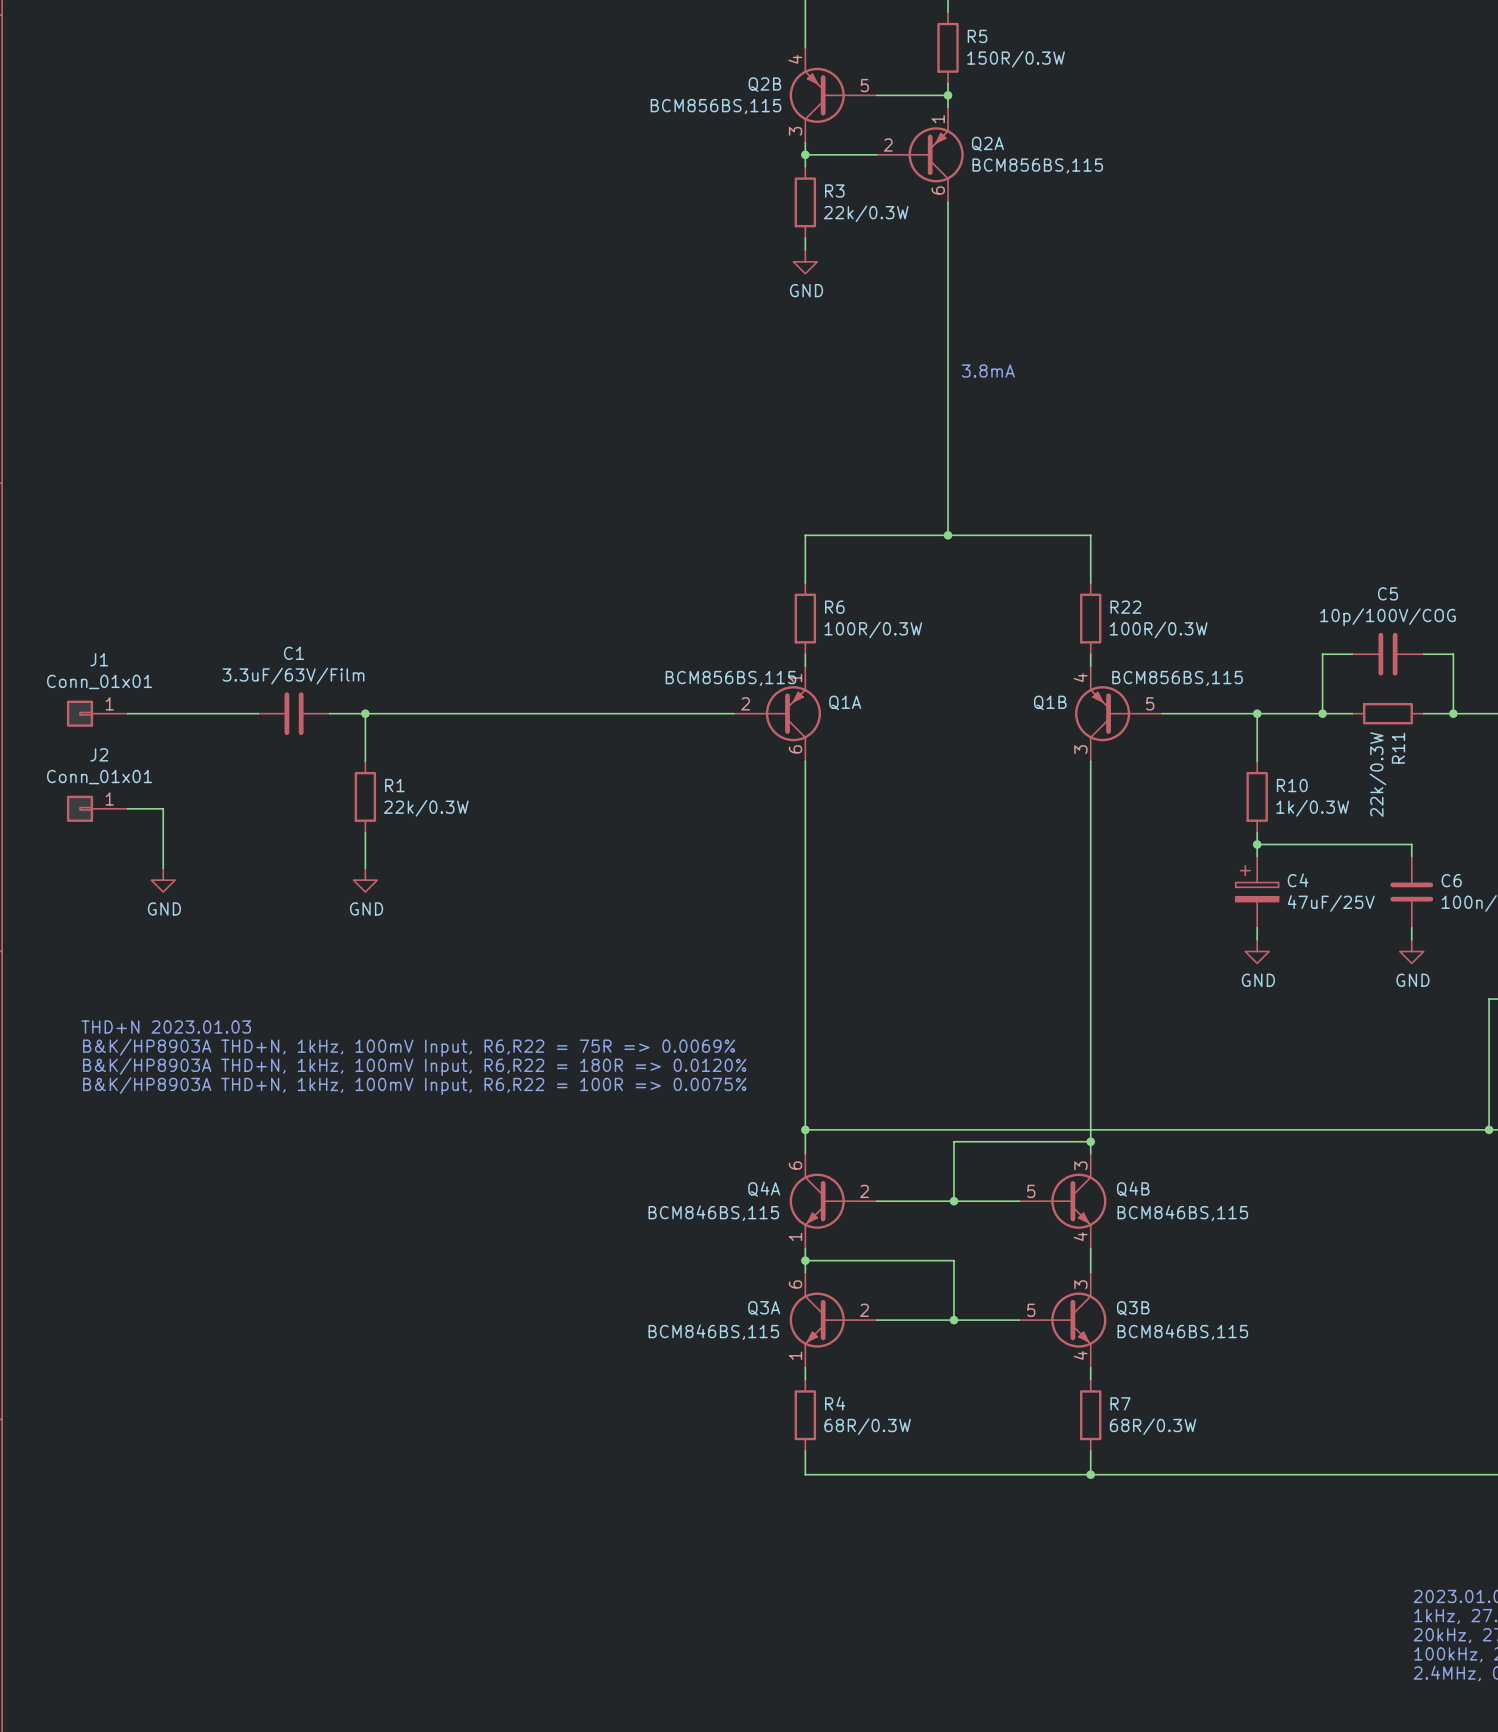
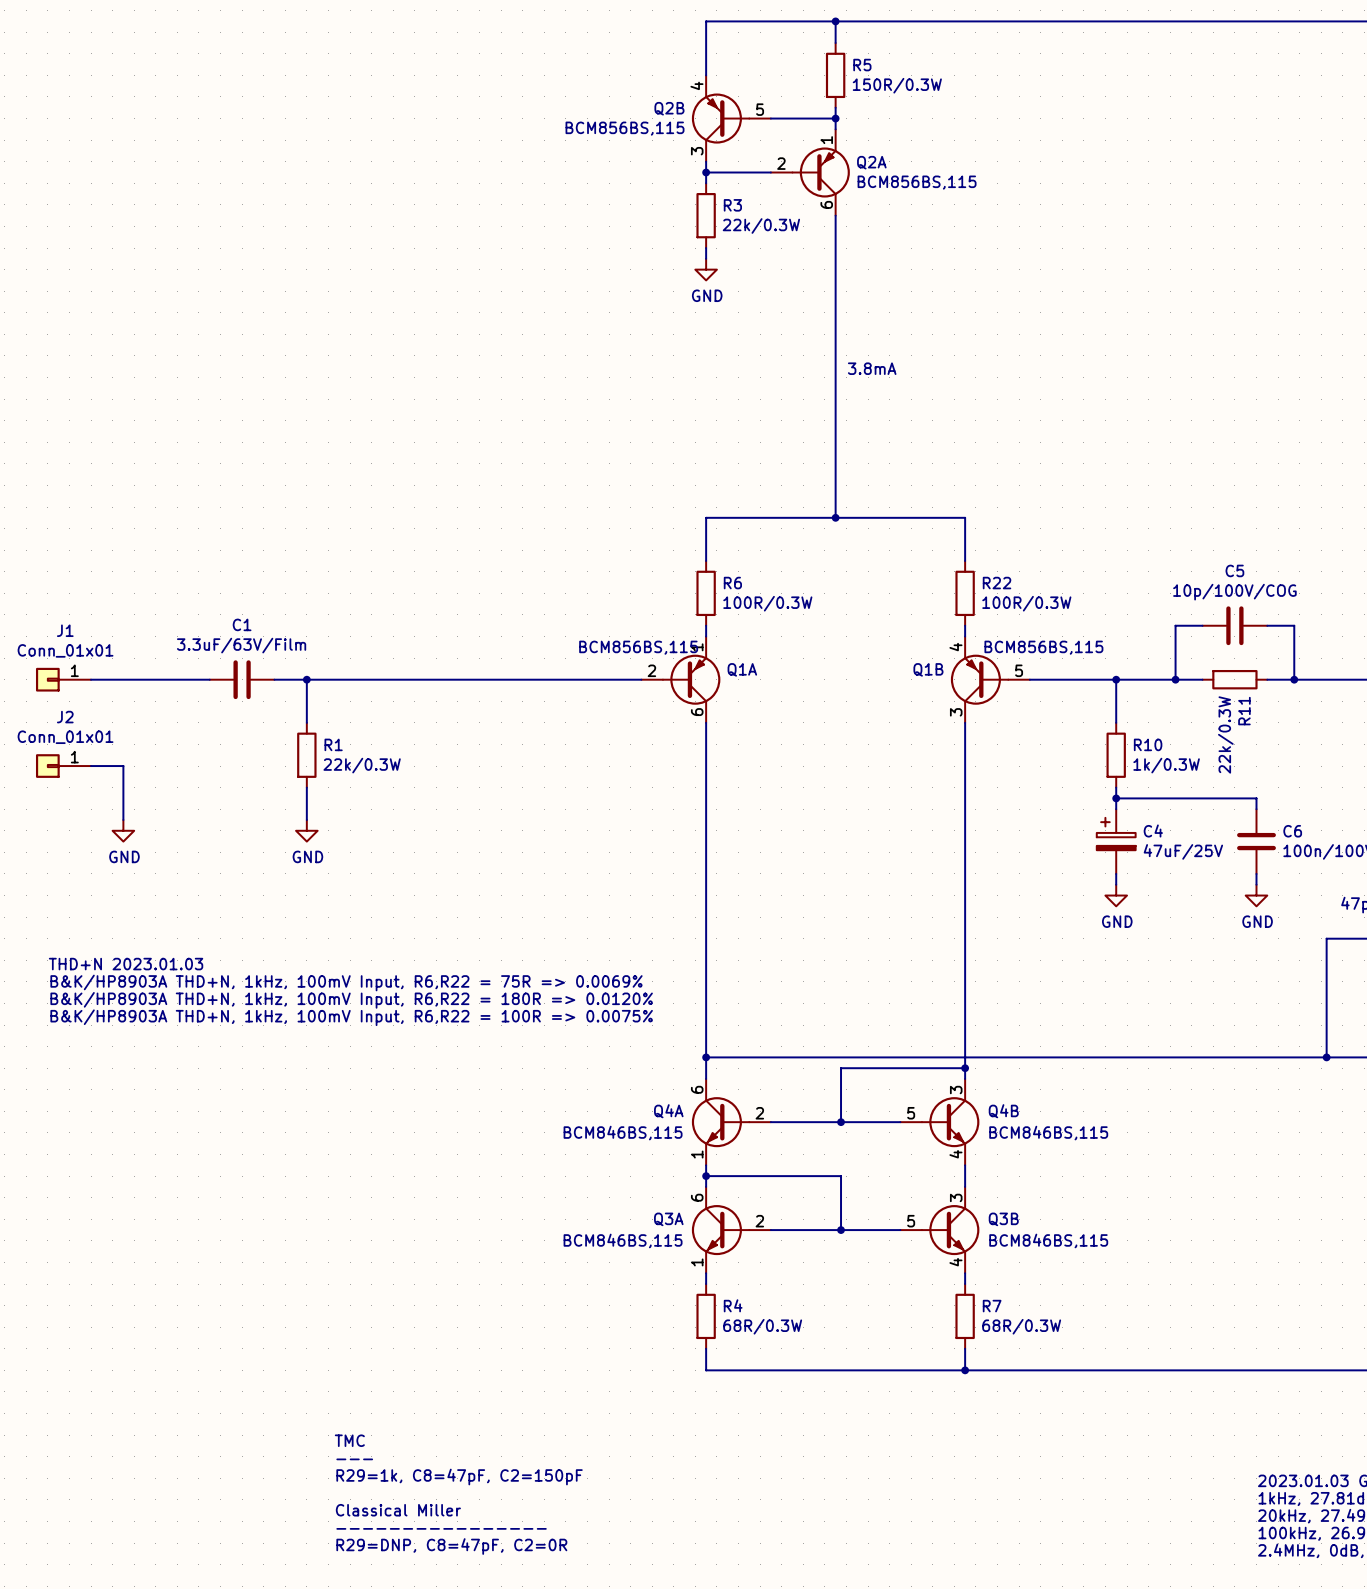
text: none -> TMC (349, 1440)
text: none -> --- (354, 1459)
text: none -> R29=1k, C8=47pF, C2=150pF (459, 1477)
text: none -> Classical Miller (398, 1510)
text: none -> ---------------- (441, 1528)
text: none -> R29=DNP, C8=47pF, C2=0R (451, 1546)

